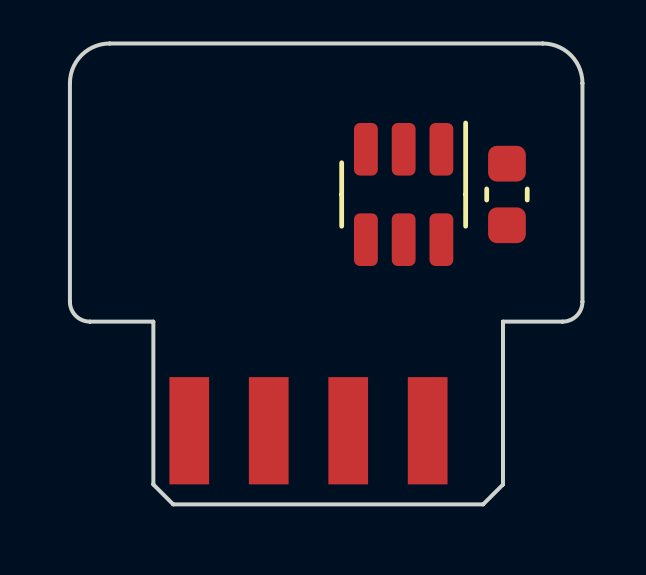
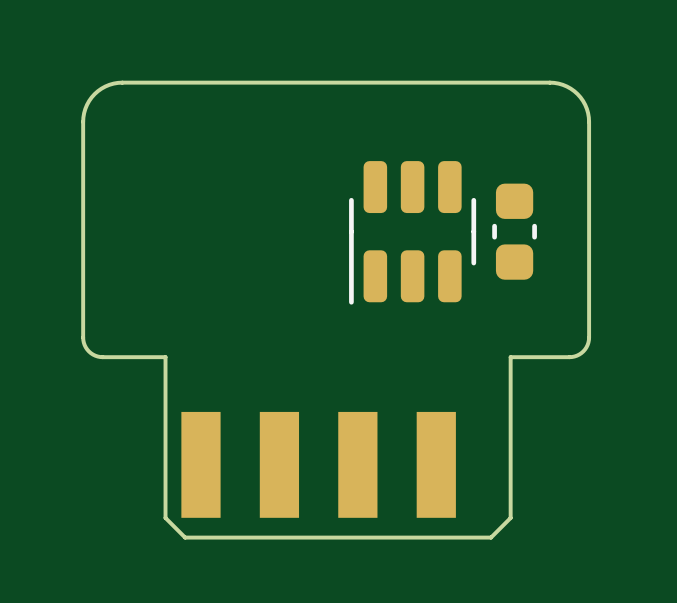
part rotation: 0° (403, 193) -> 180° (412, 232)

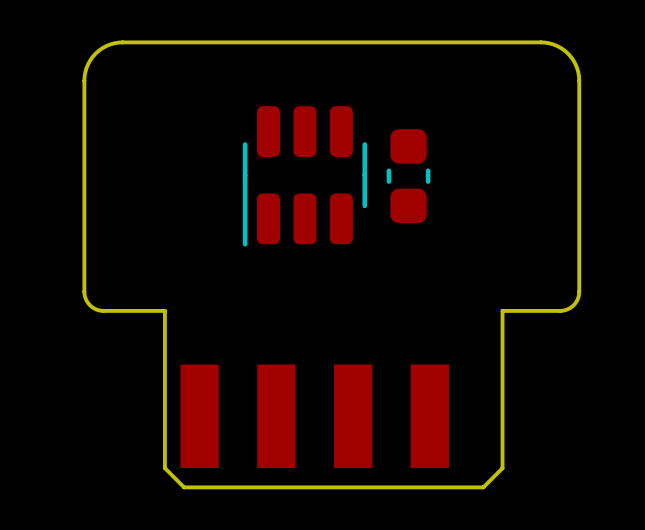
part footprint: [349, 161, 477, 305] -> [386, 129, 431, 224]
part: none -> (304, 176)
part: (514, 231) -> none

